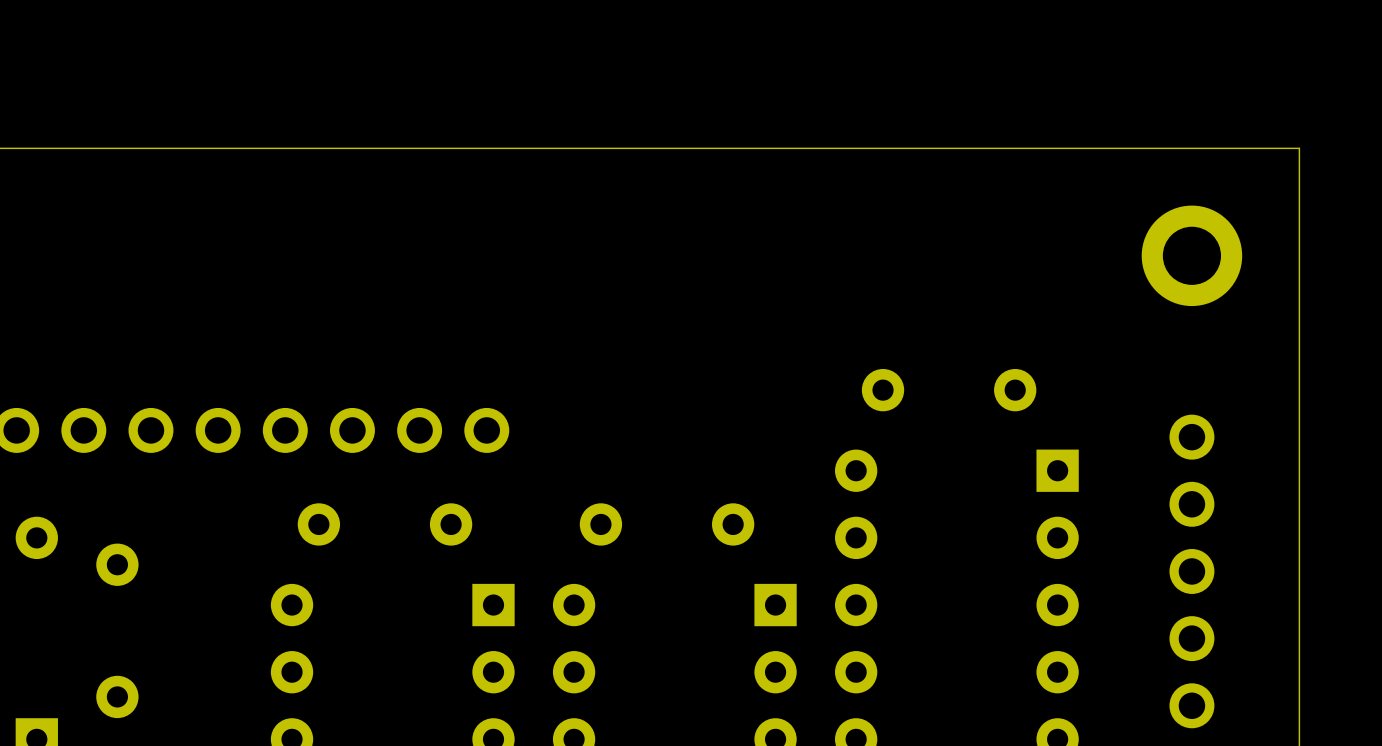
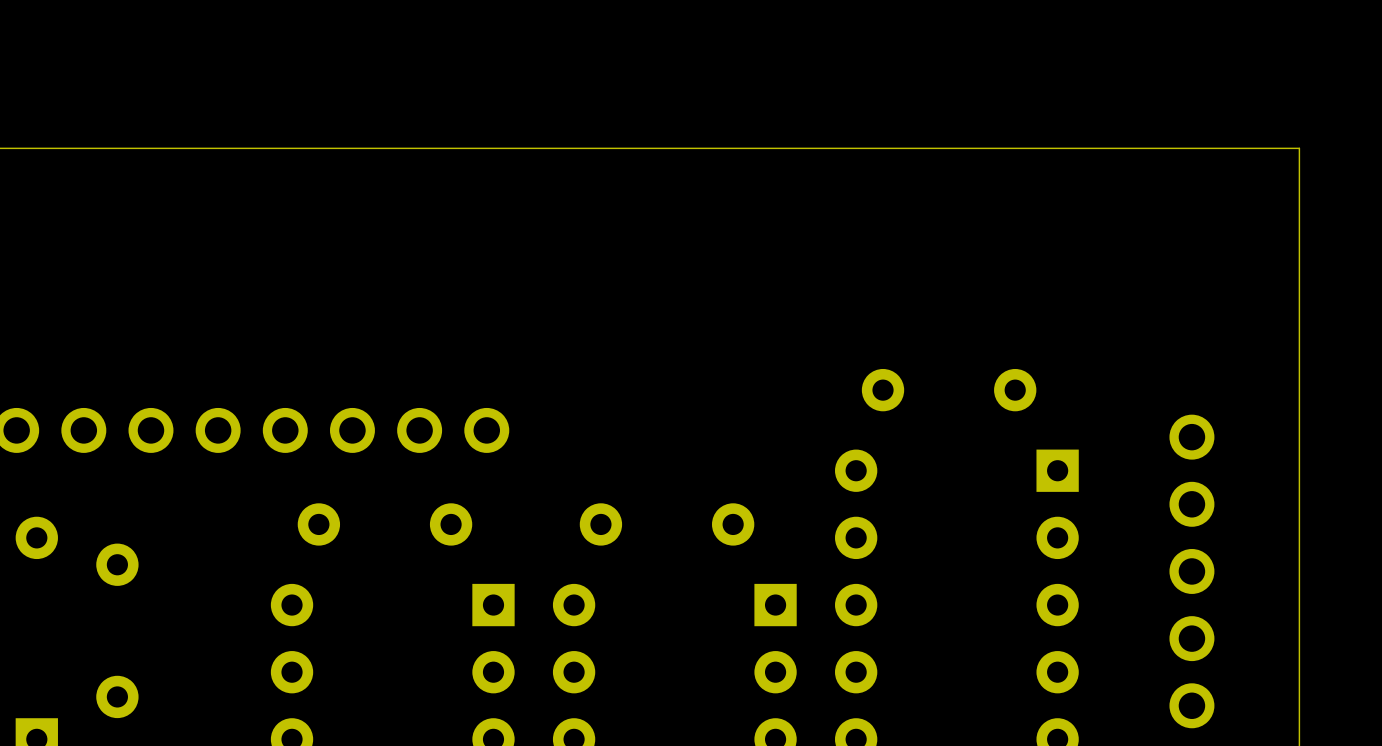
part: (1191, 255) -> none

